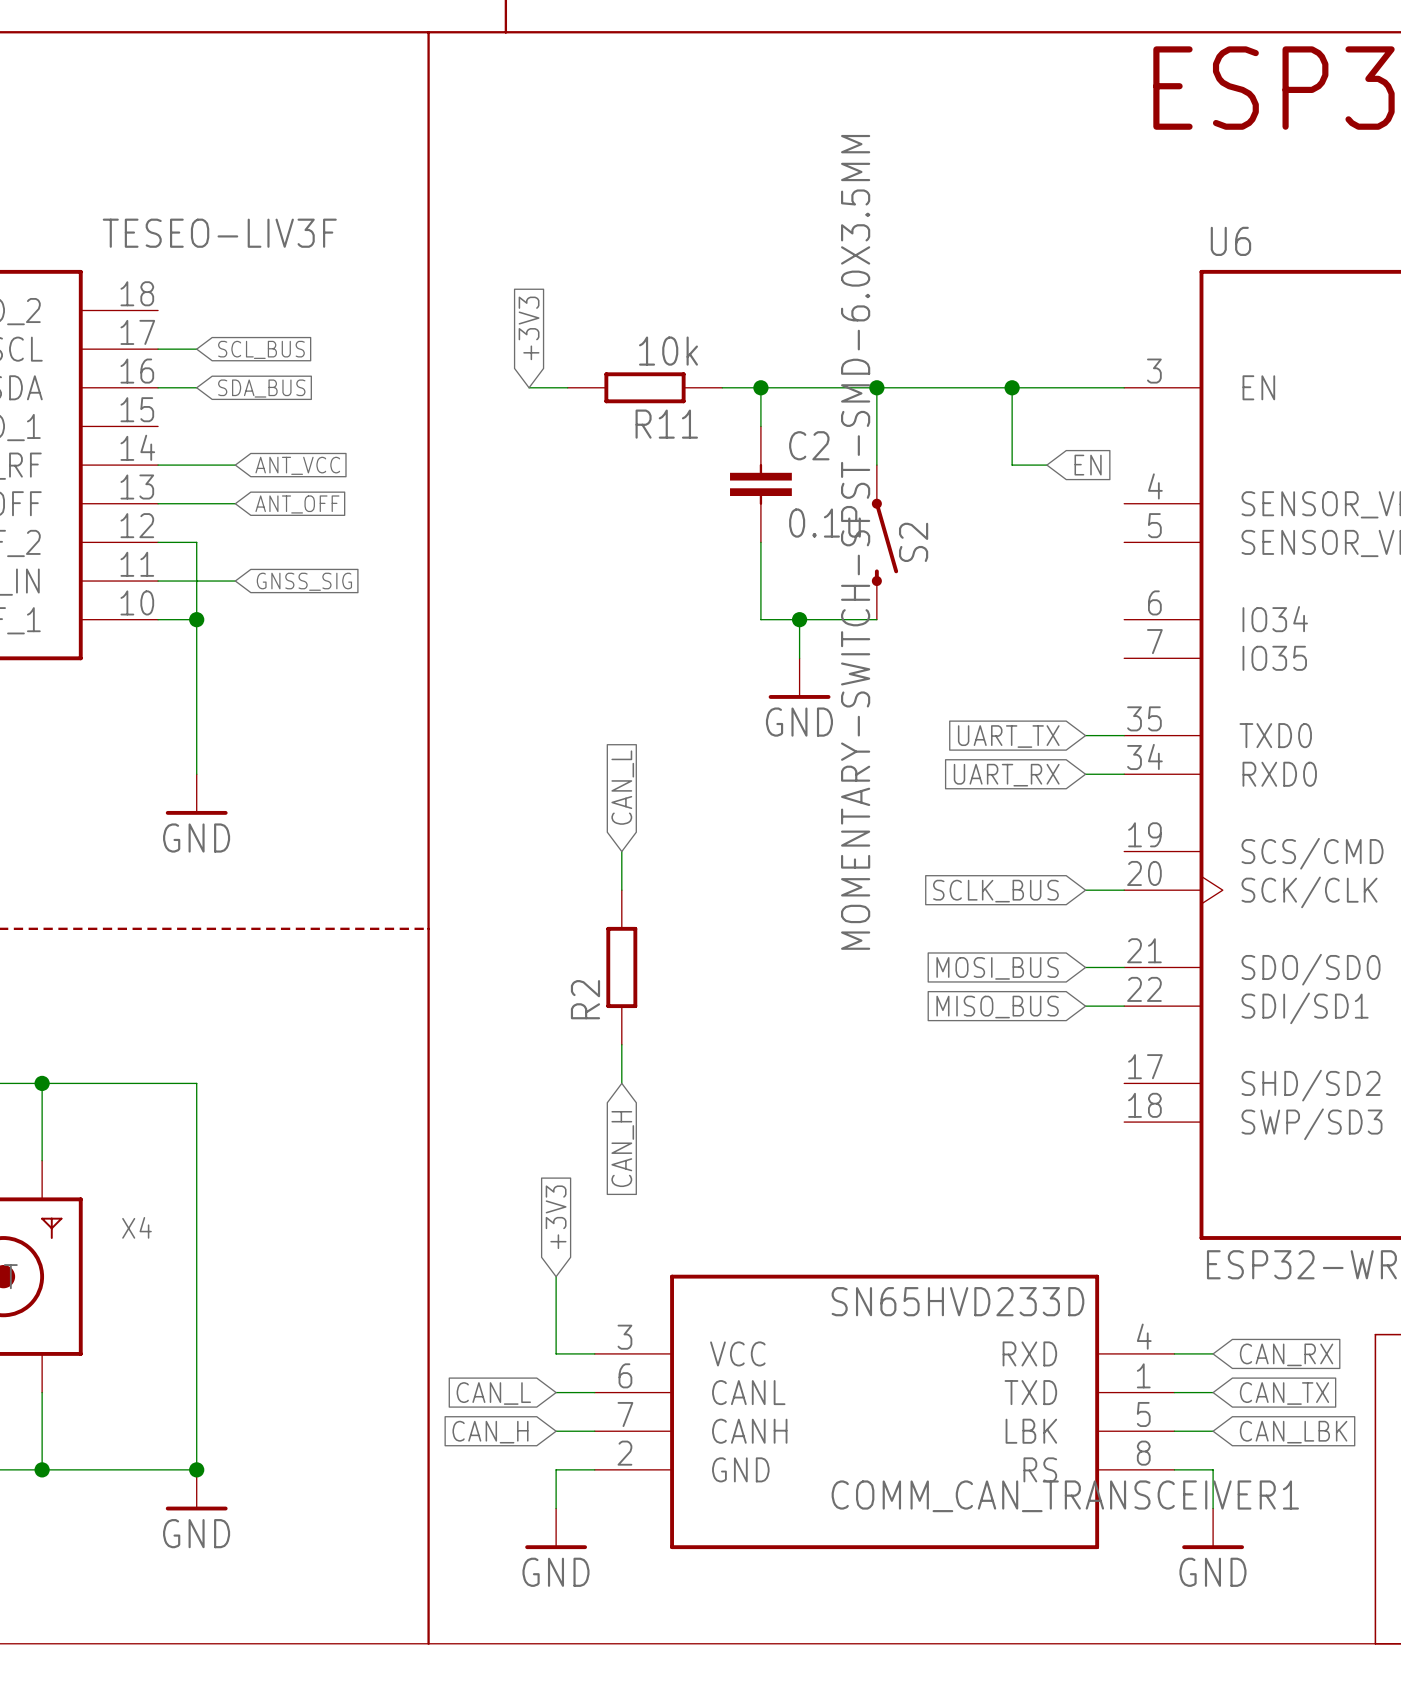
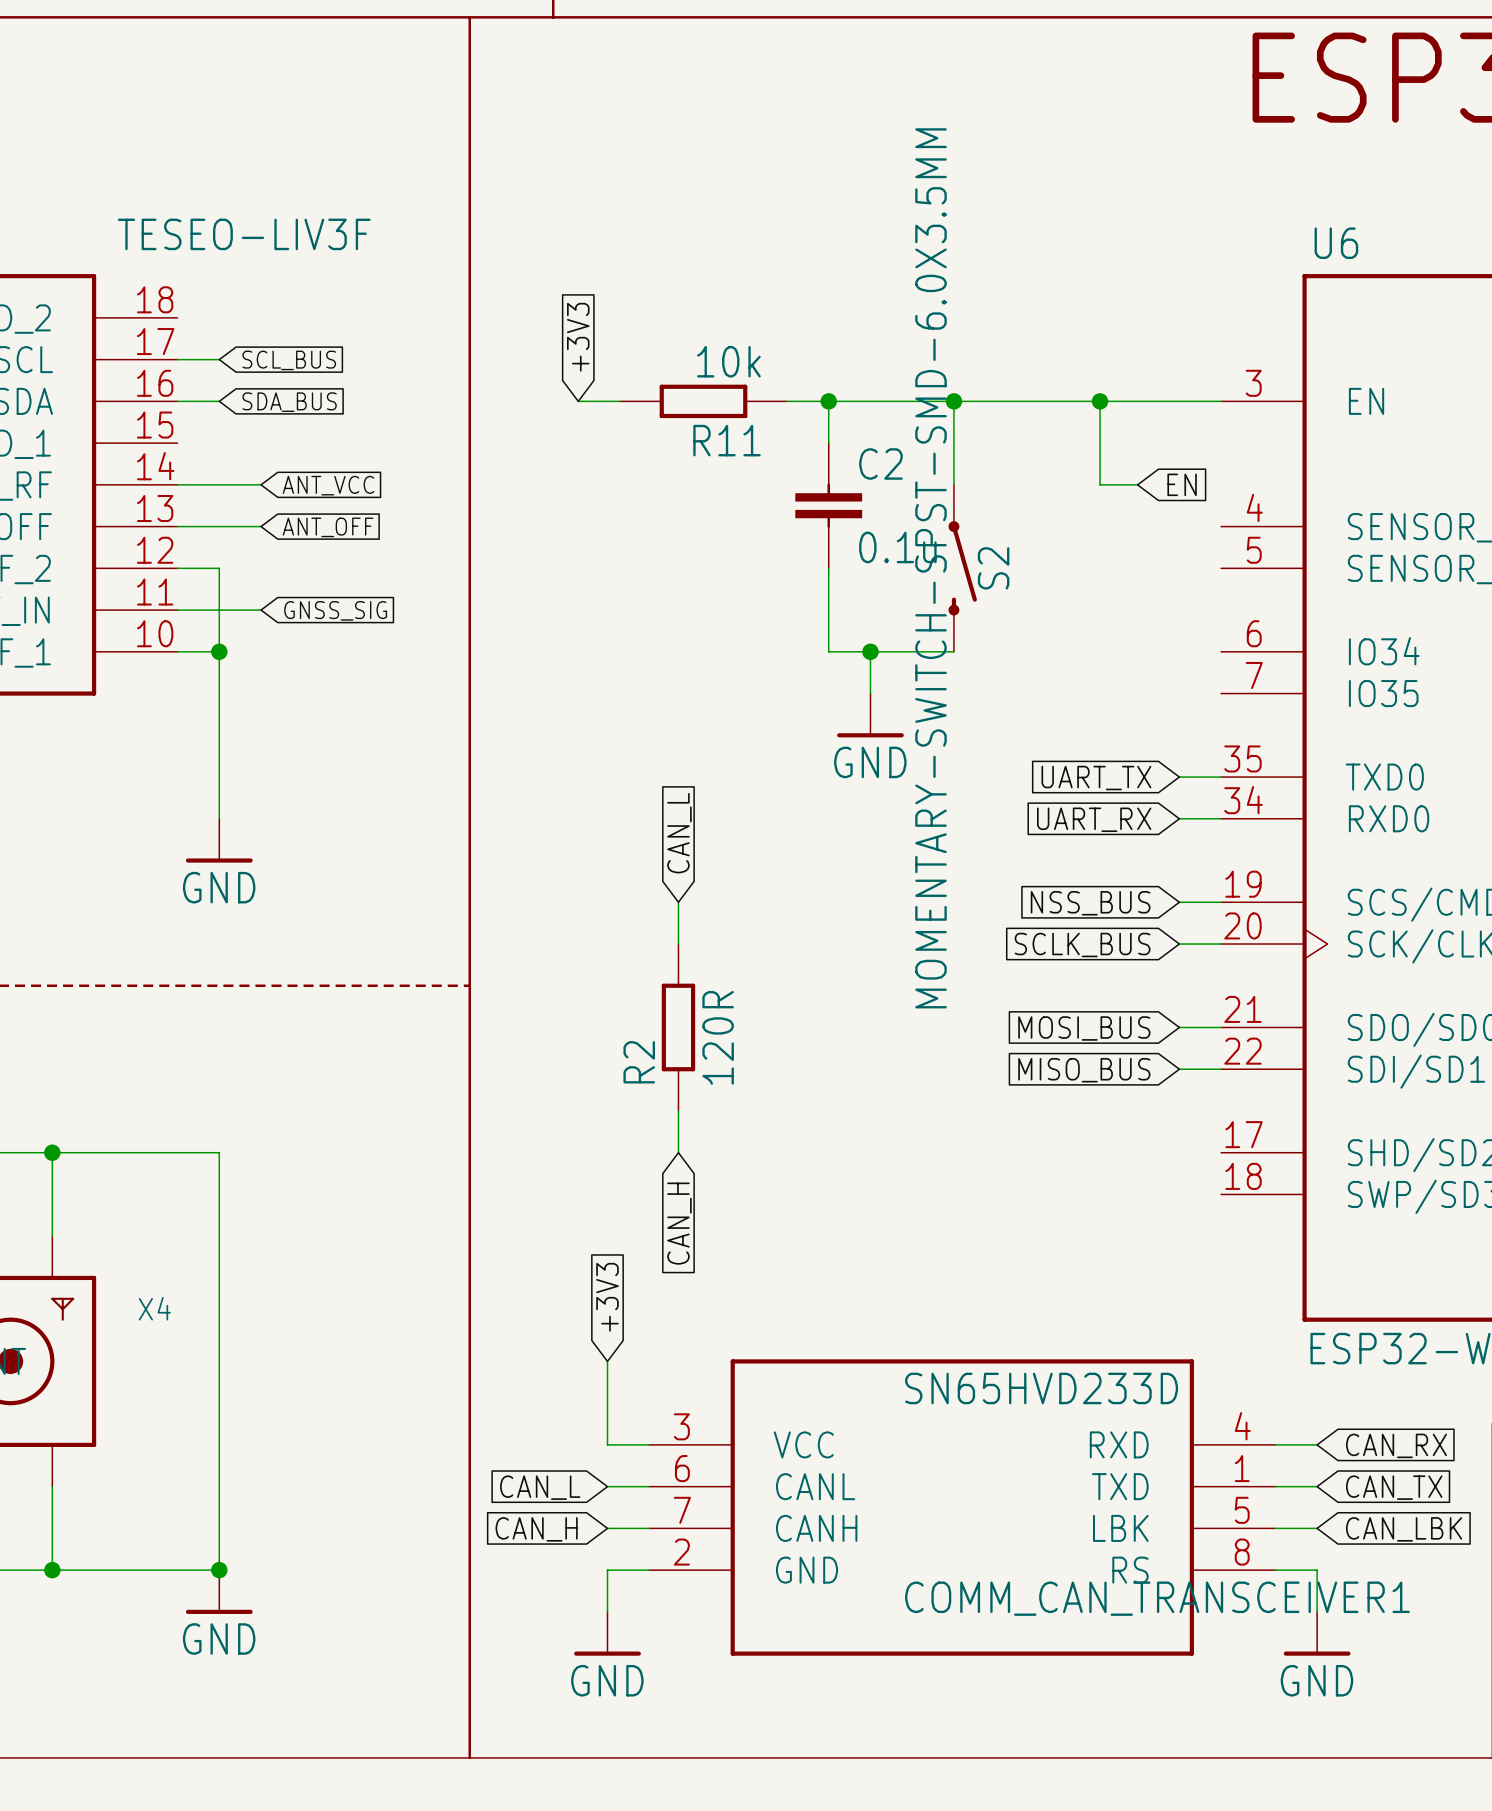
wire: none -> (1179, 902) (1221, 902)
global label: none -> NSS_BUS (1090, 903)
R2 value: none -> 120R (718, 1037)

